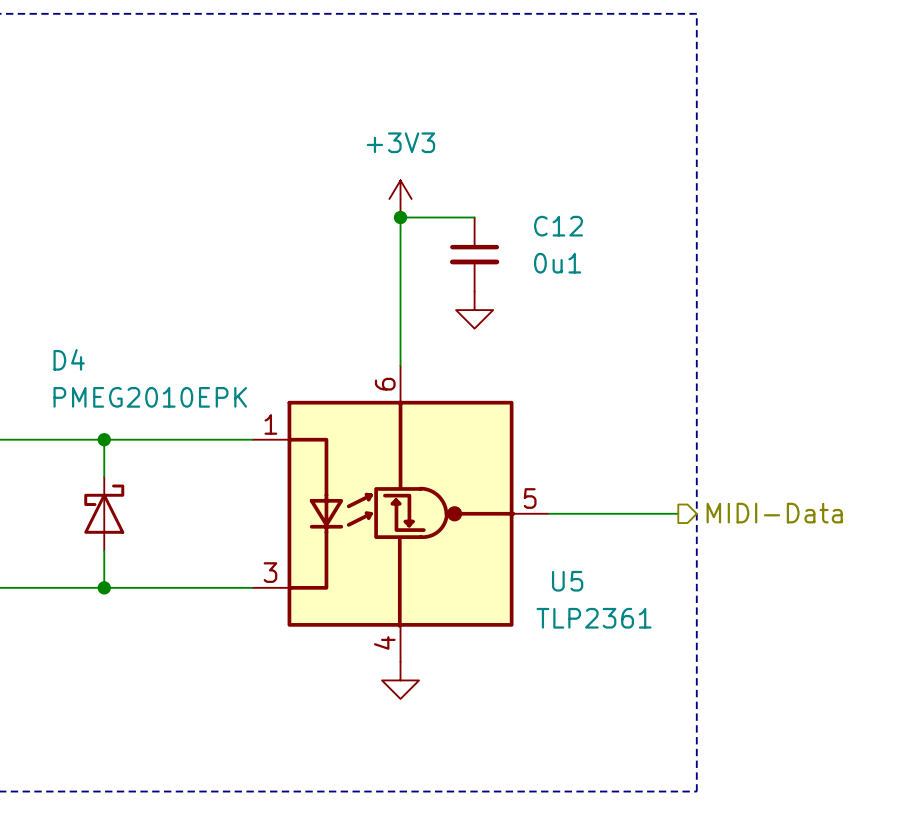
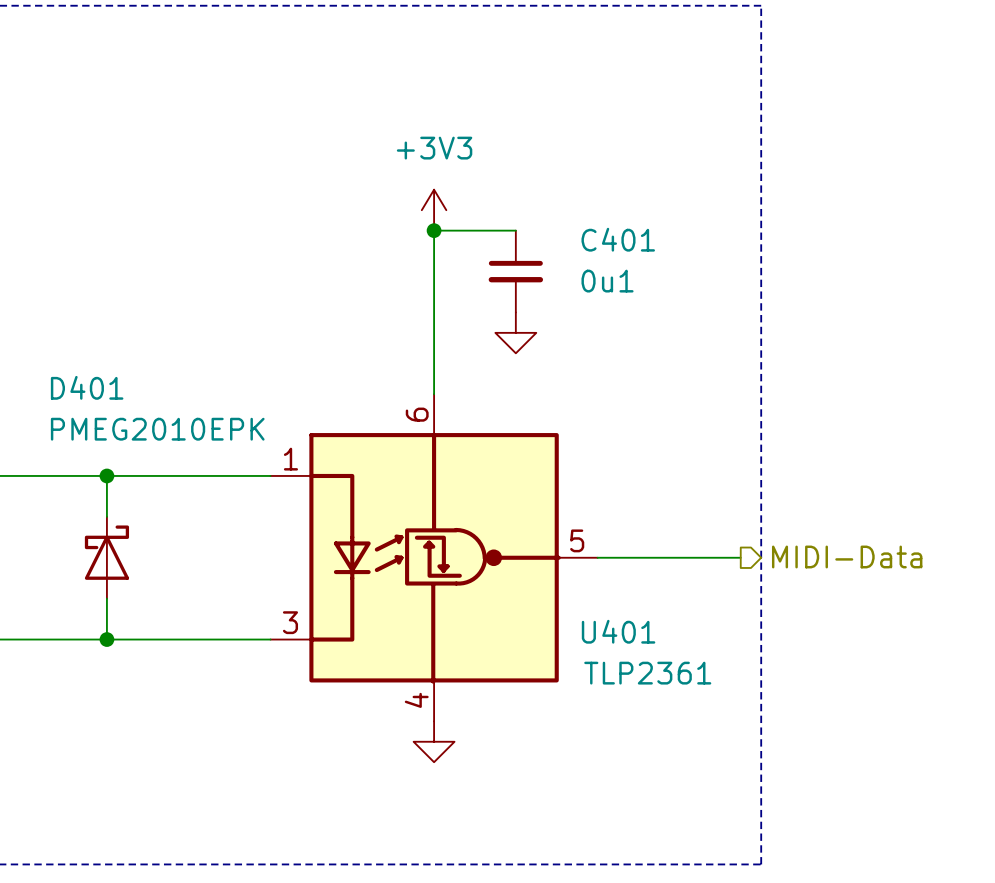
C12 name: C12 (558, 226) -> C401 (618, 239)
D4 name: D4 (69, 359) -> D401 (87, 387)
U5 name: U5 (567, 581) -> U401 (618, 631)

